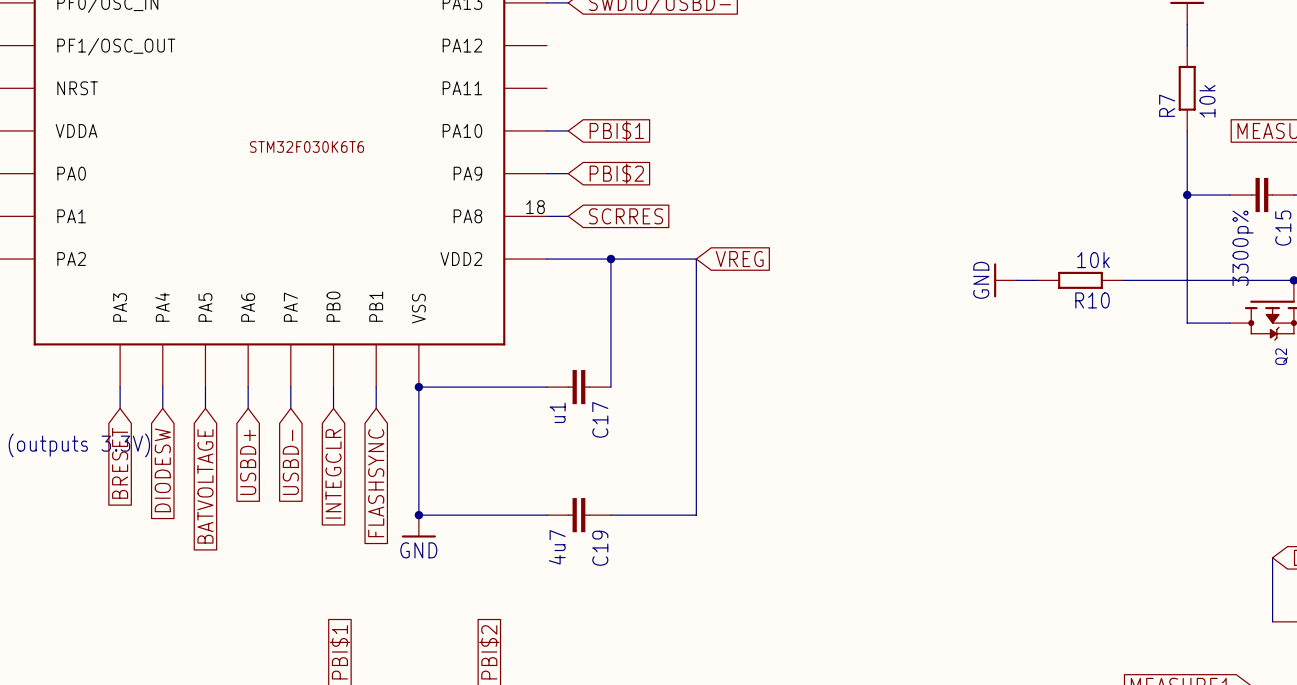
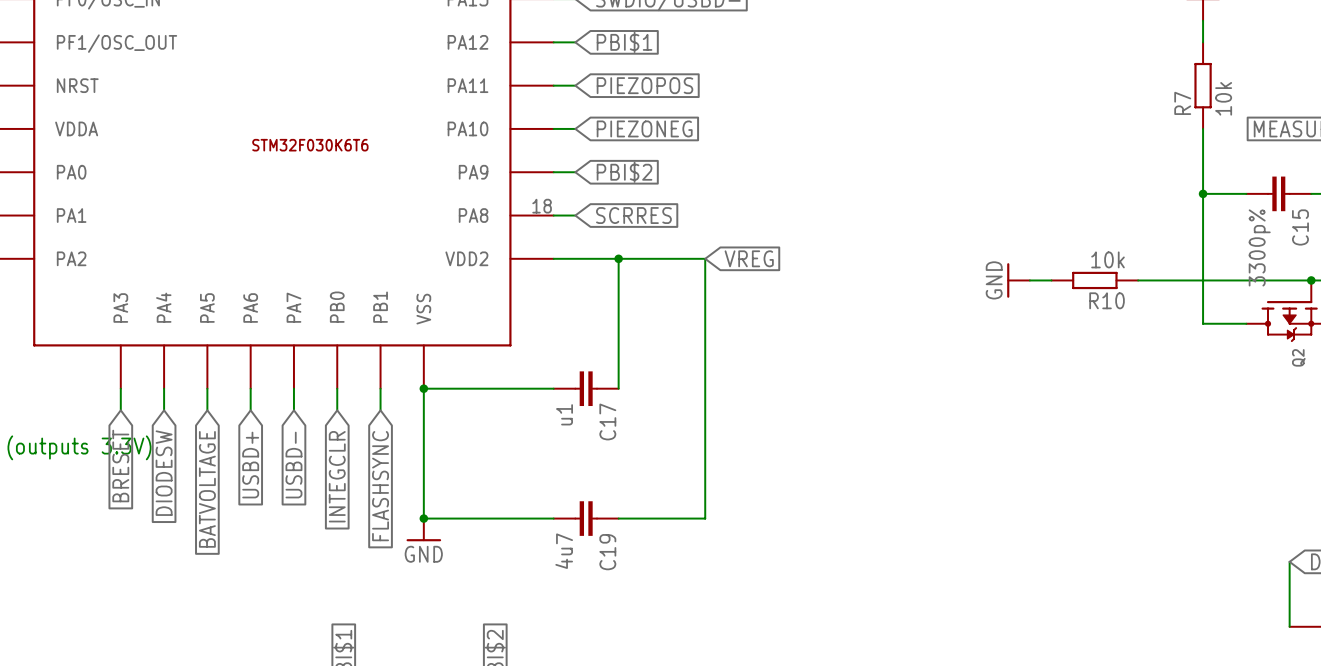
wire: none -> (553, 42) (575, 42)
global label: none -> PBI$1 (624, 42)
wire: none -> (553, 85) (575, 85)
global label: none -> PIEZOPOS (644, 85)
global label: PBI$1 (616, 130) -> PIEZONEG (644, 128)

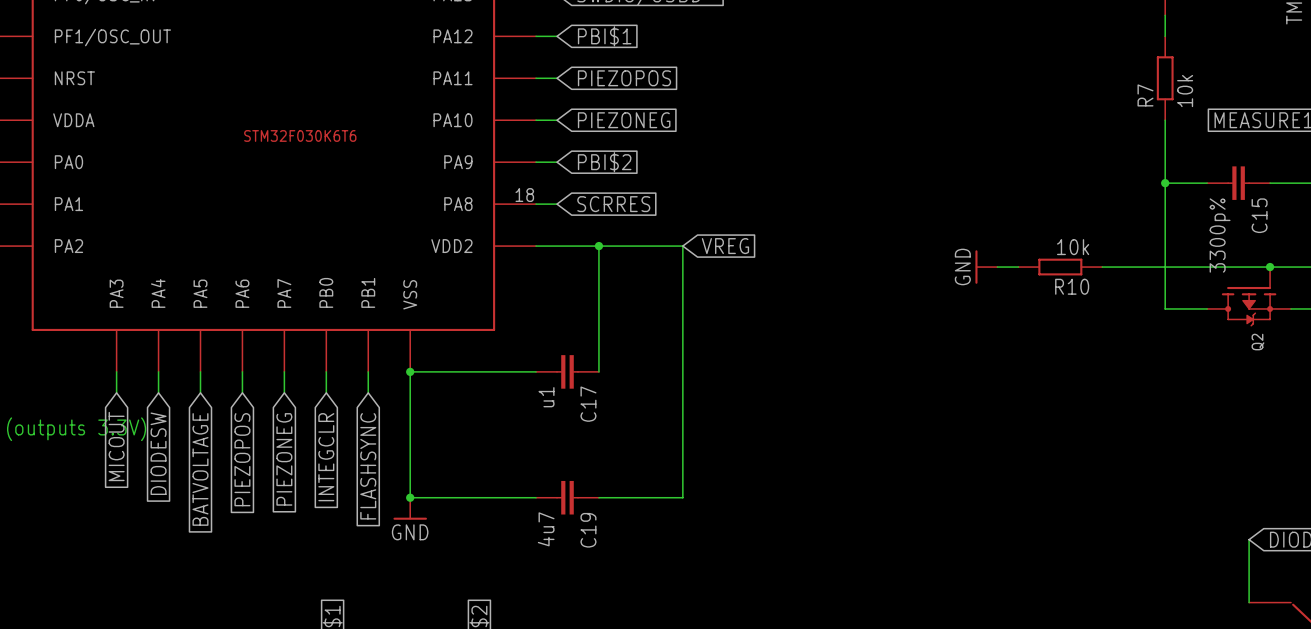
global label: USBD+ (250, 465) -> PIEZOPOS (242, 459)
global label: USBD- (293, 465) -> PIEZONEG (284, 459)
global label: BRESET (120, 466) -> MICOUT (116, 446)

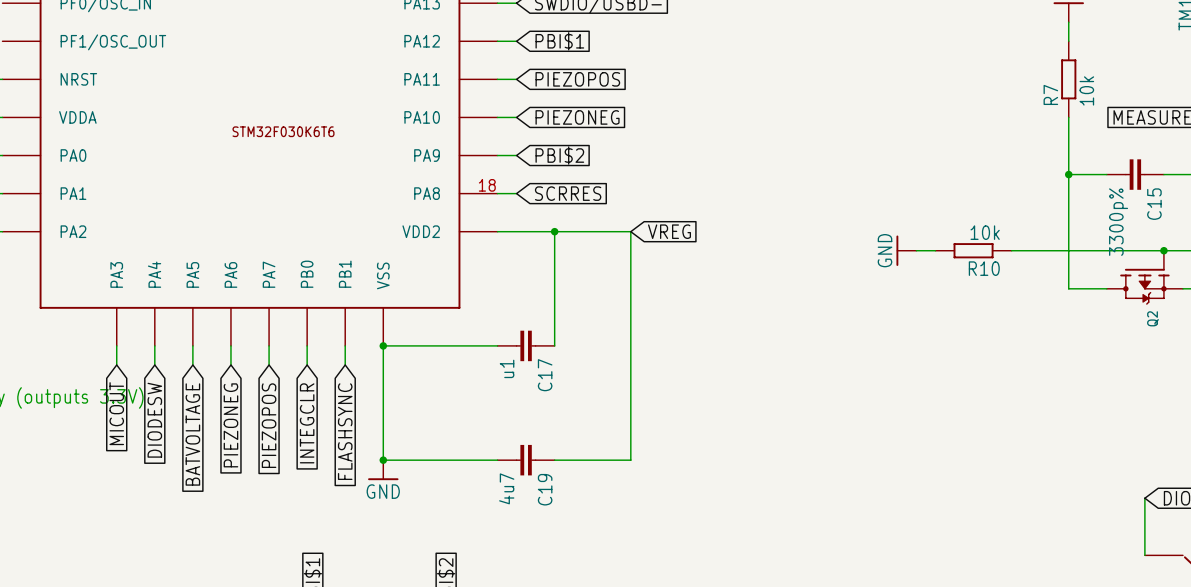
global label: PIEZOPOS (242, 459) -> PIEZONEG (230, 425)
global label: PIEZONEG (284, 459) -> PIEZOPOS (269, 425)

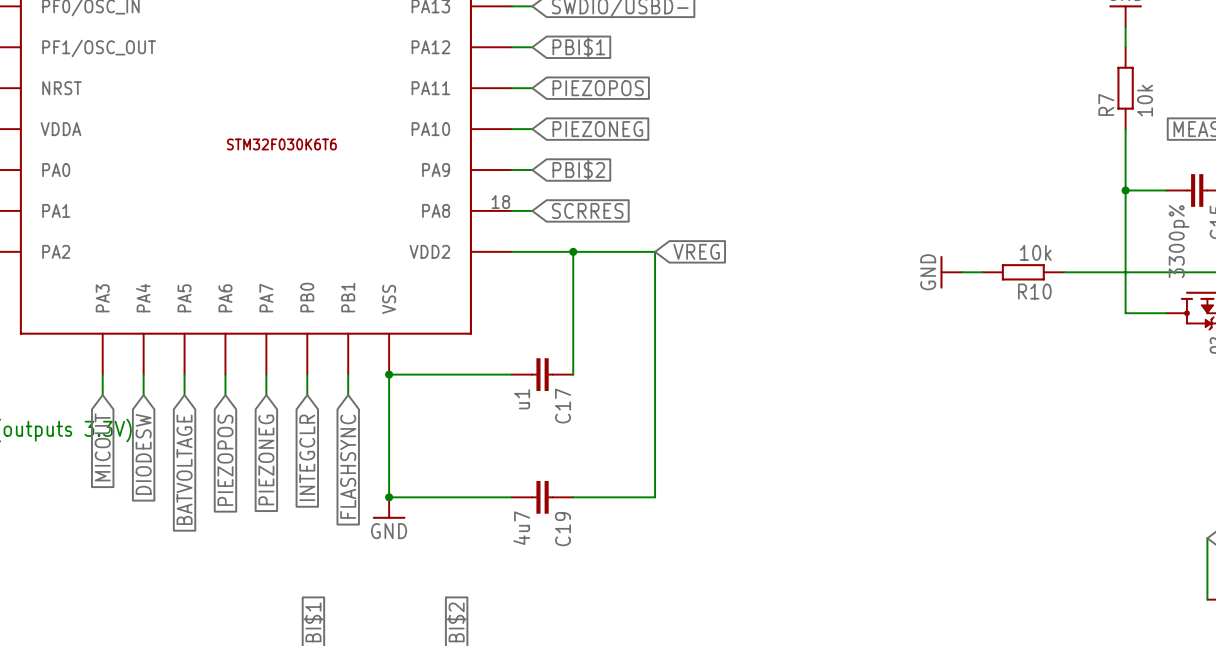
global label: PIEZONEG (230, 425) -> PIEZOPOS (225, 460)
global label: PIEZOPOS (269, 425) -> PIEZONEG (266, 459)

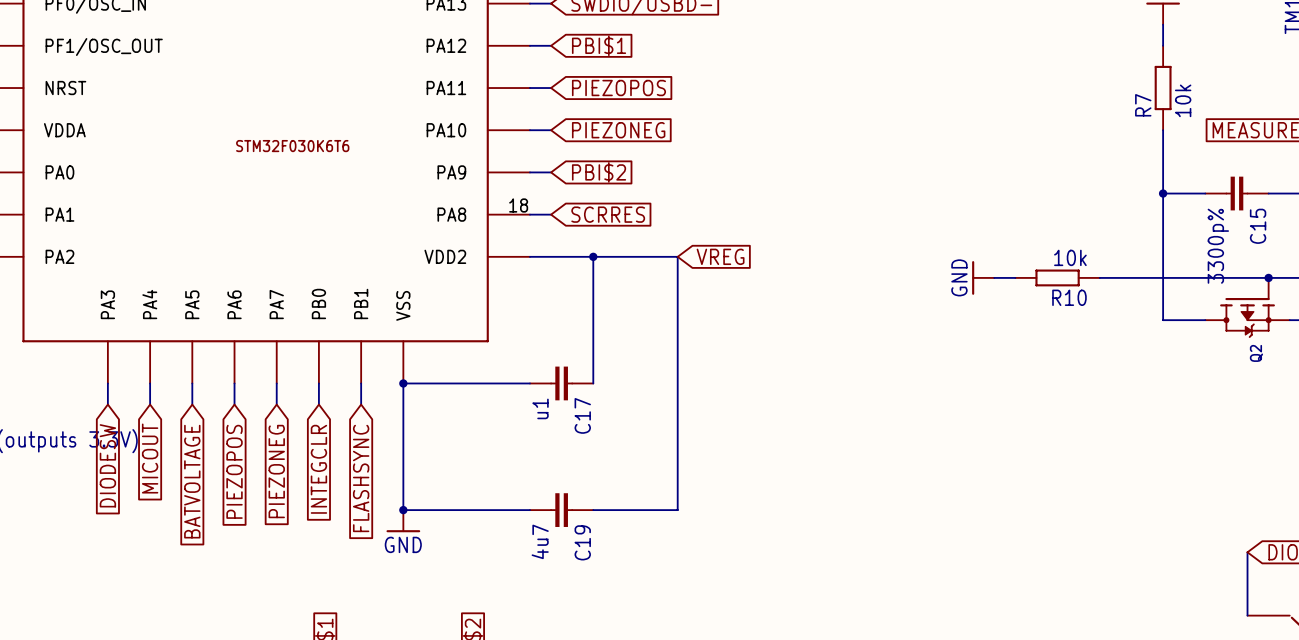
global label: MICOUT (102, 447) -> DIODESW (107, 465)
global label: DIODESW (143, 454) -> MICOUT (150, 458)

